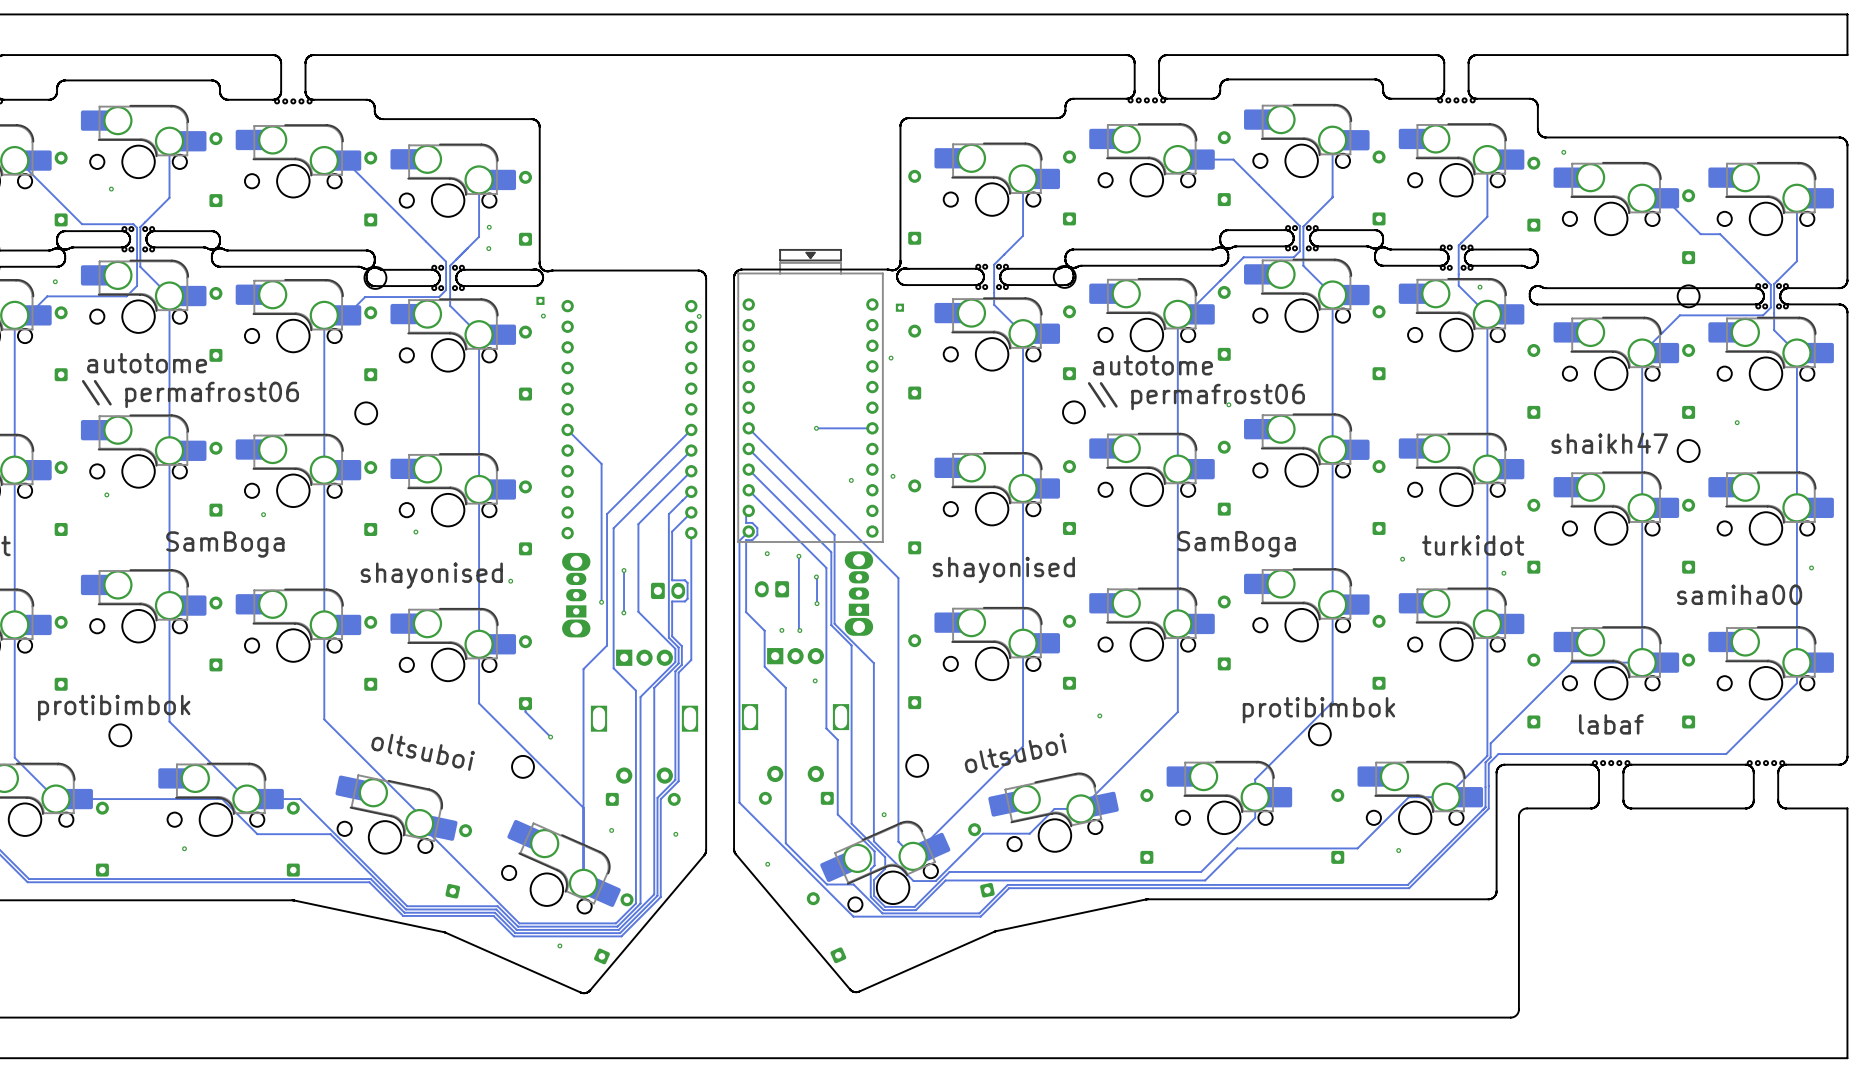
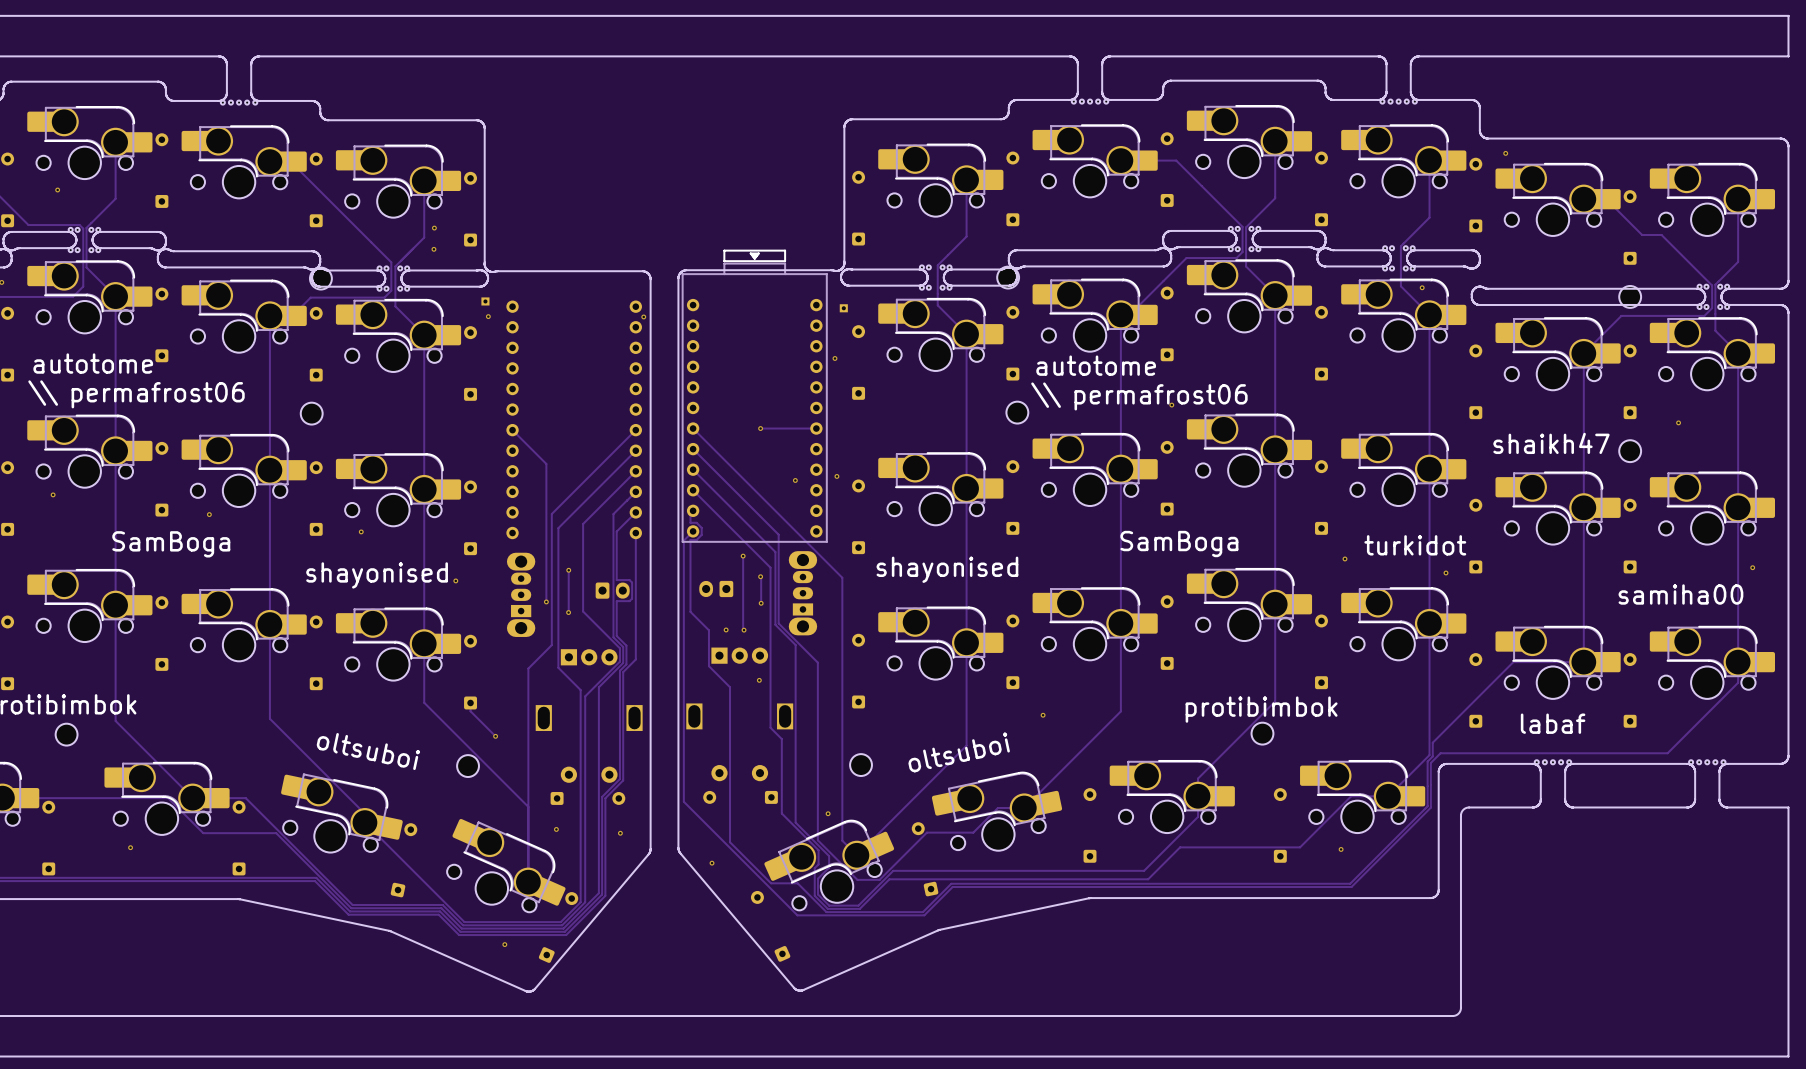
via: (767, 553) -> none

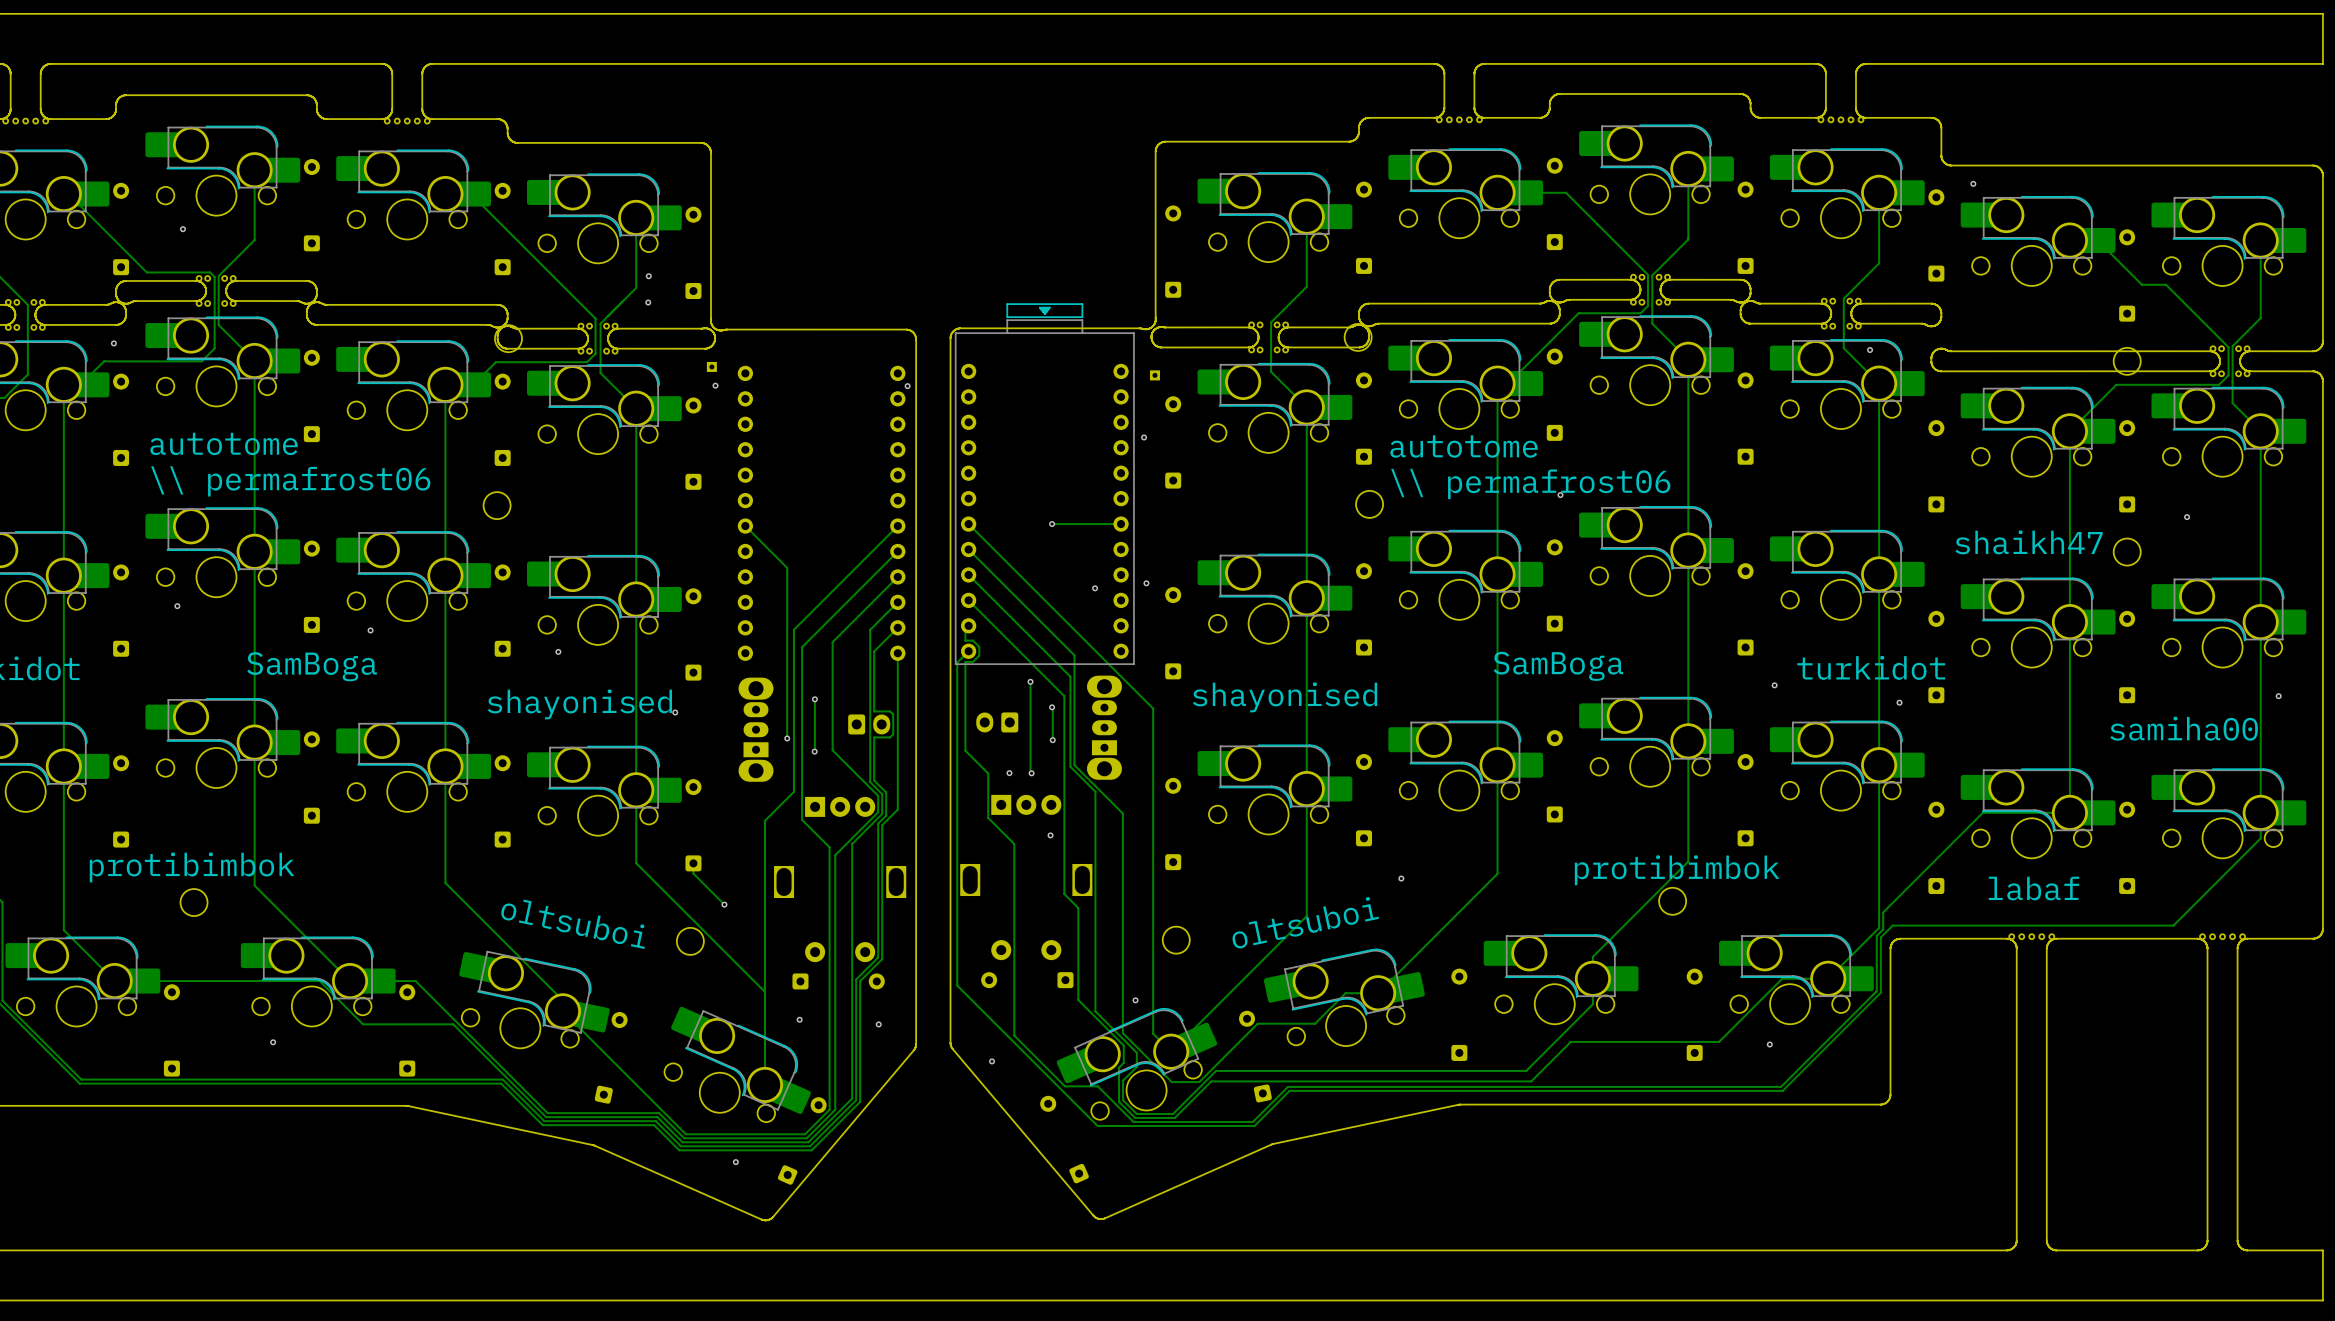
board edge: (1540, 799) (1538, 804) (1533, 807) (1468, 807) (1461, 812) (1460, 1007) (1458, 1013) (1452, 1016) -> (2016, 982) (2015, 1244) (2012, 1248) (2007, 1250) (1908, 1250)
board edge: (1695, 799) (1692, 805) (1687, 807) (1572, 807) (1567, 804) (1565, 799) -> (2207, 982) (2207, 1240) (2204, 1247) (2197, 1250) (2056, 1250) (2047, 1245) (2046, 982)
board edge: (1719, 799) (1721, 804) (1726, 807) (1788, 807) (1788, 1056) -> (2237, 982) (2237, 1242) (2240, 1247) (2246, 1250) (2322, 1250) (2322, 1300)

